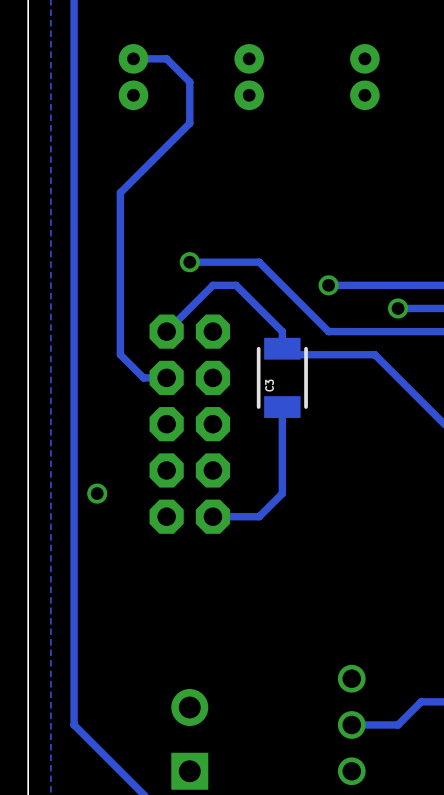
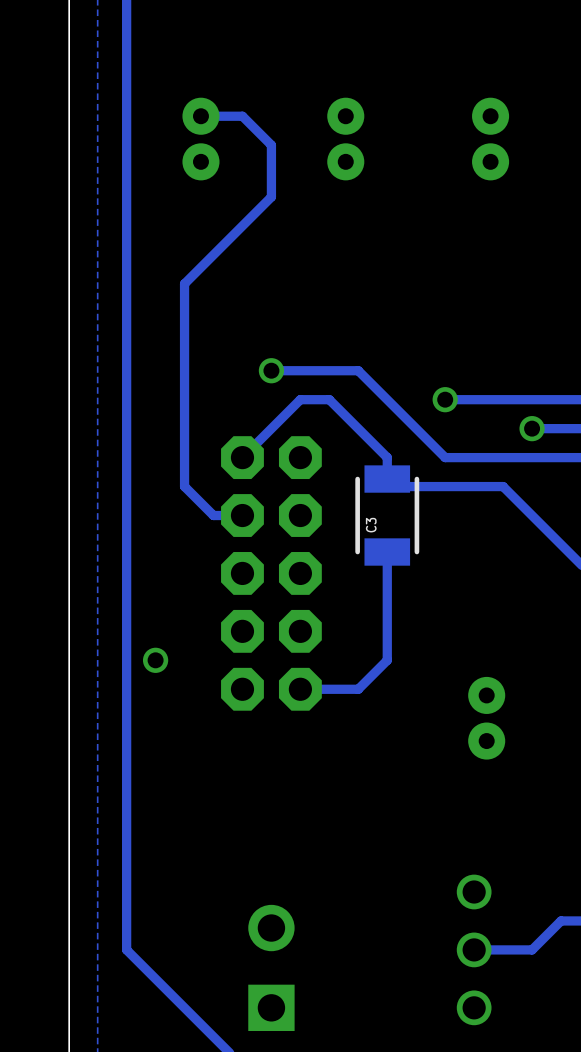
part: none -> (486, 718)

